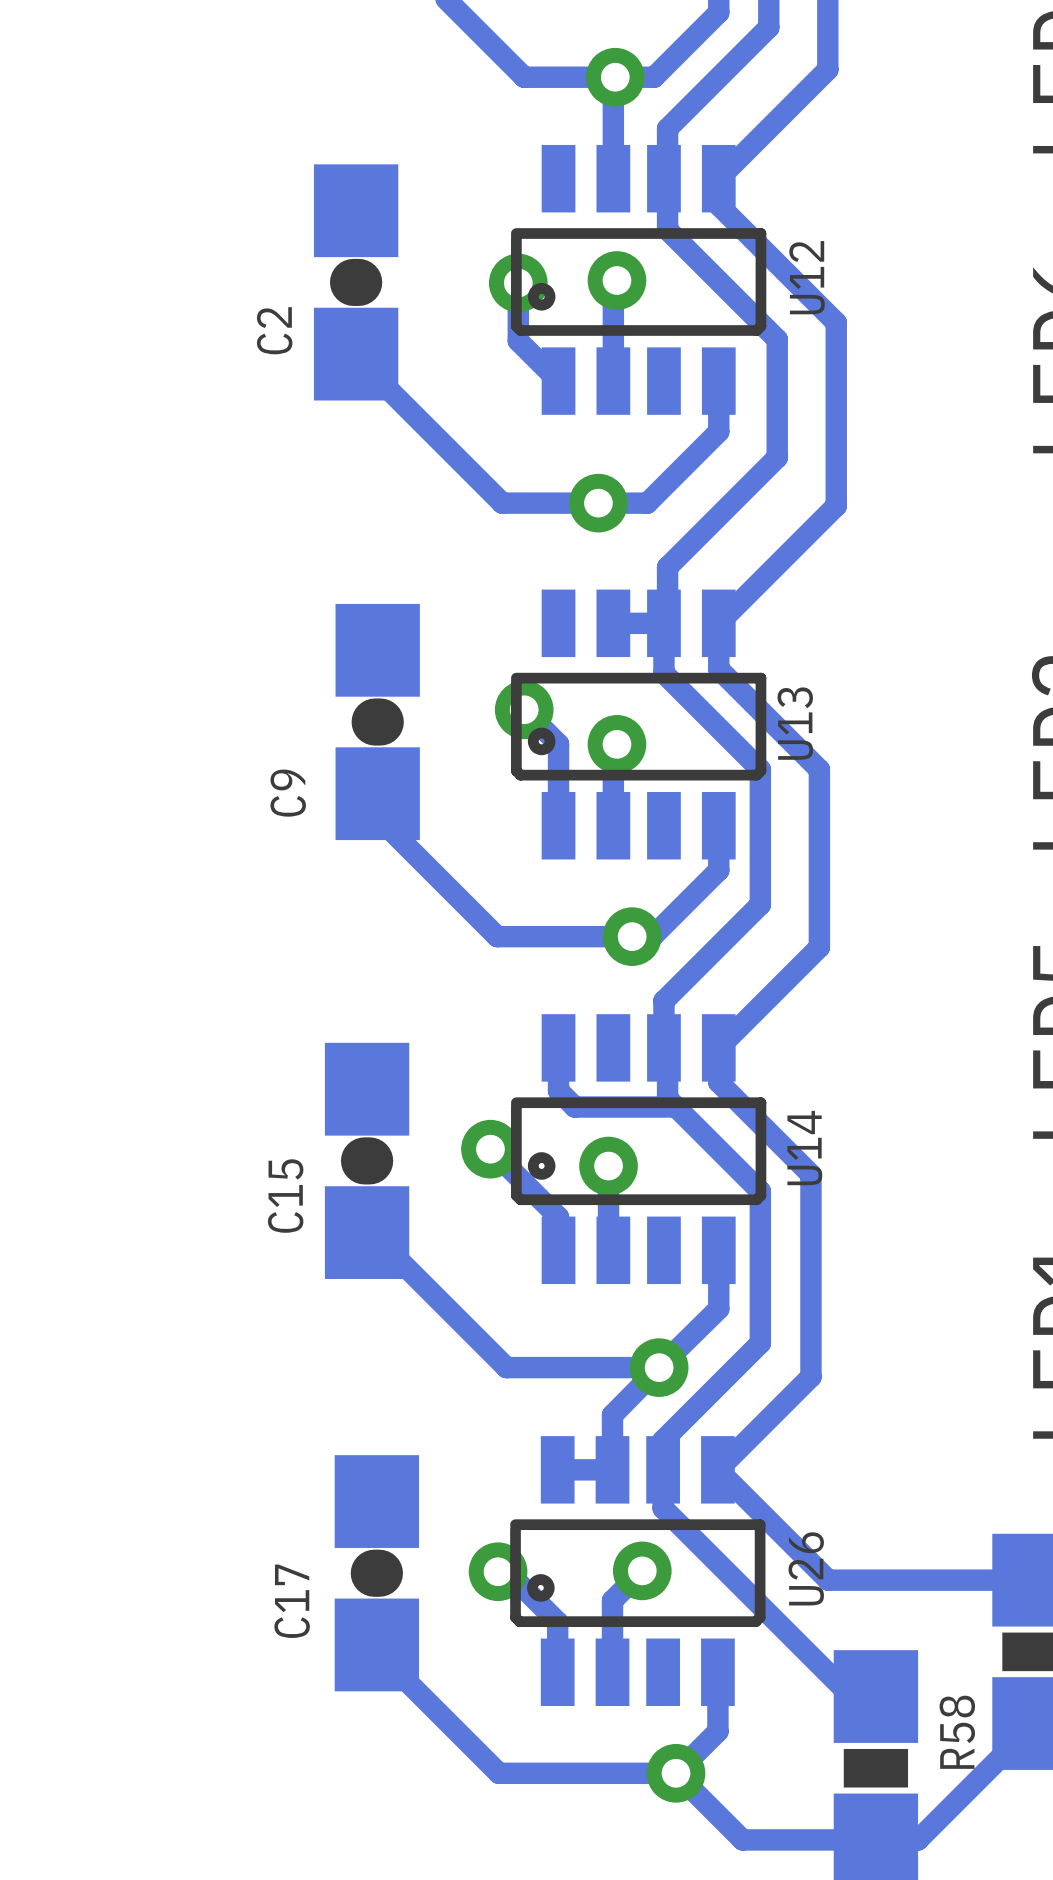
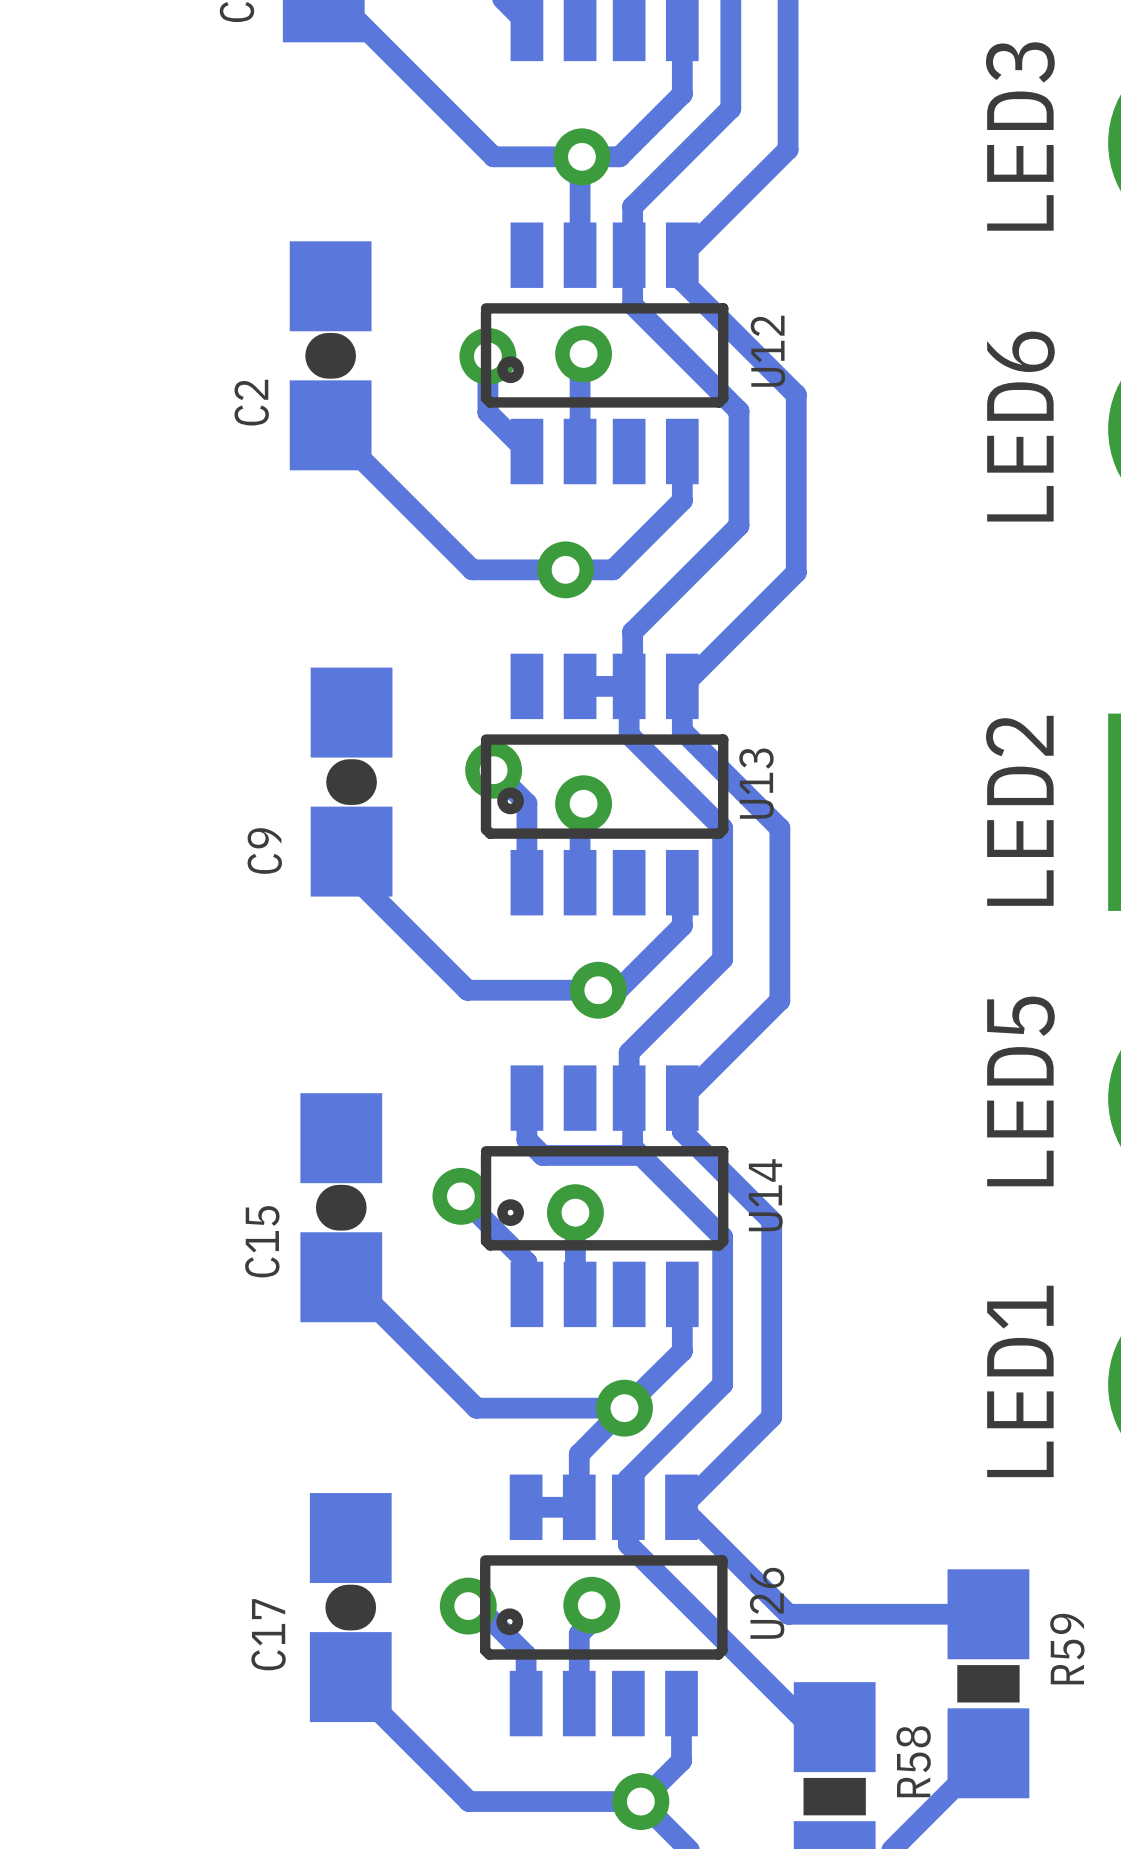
via position: (642, 1570) -> (591, 1605)

